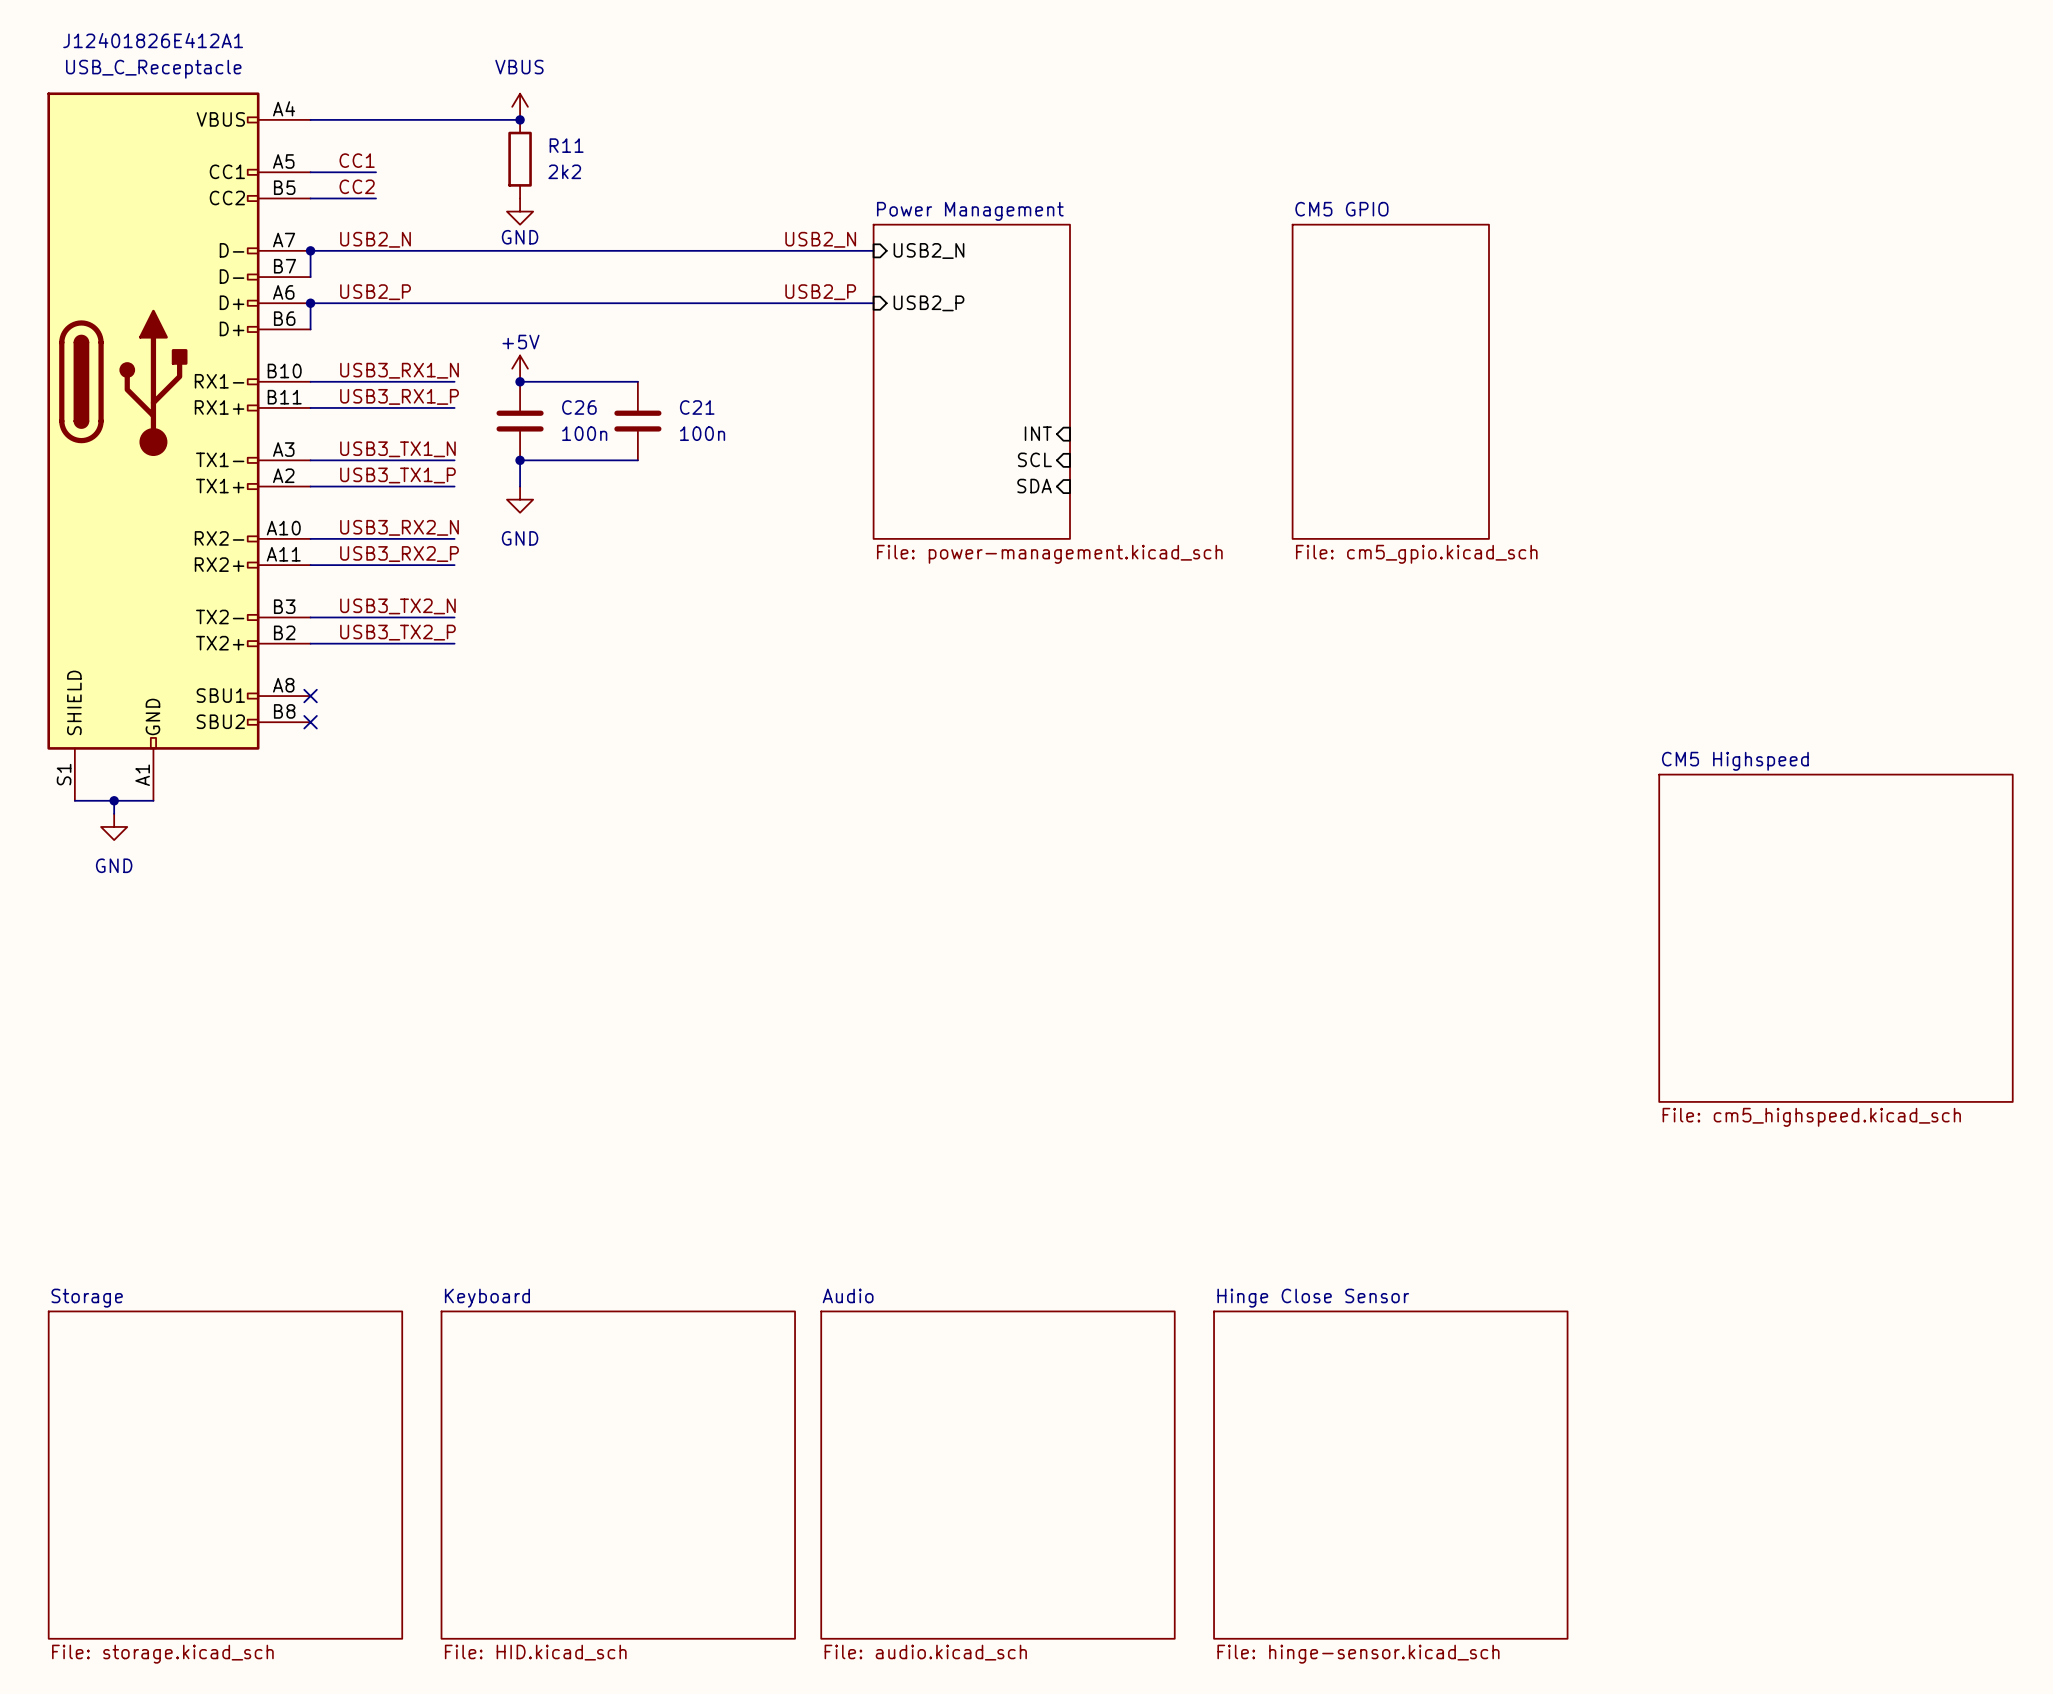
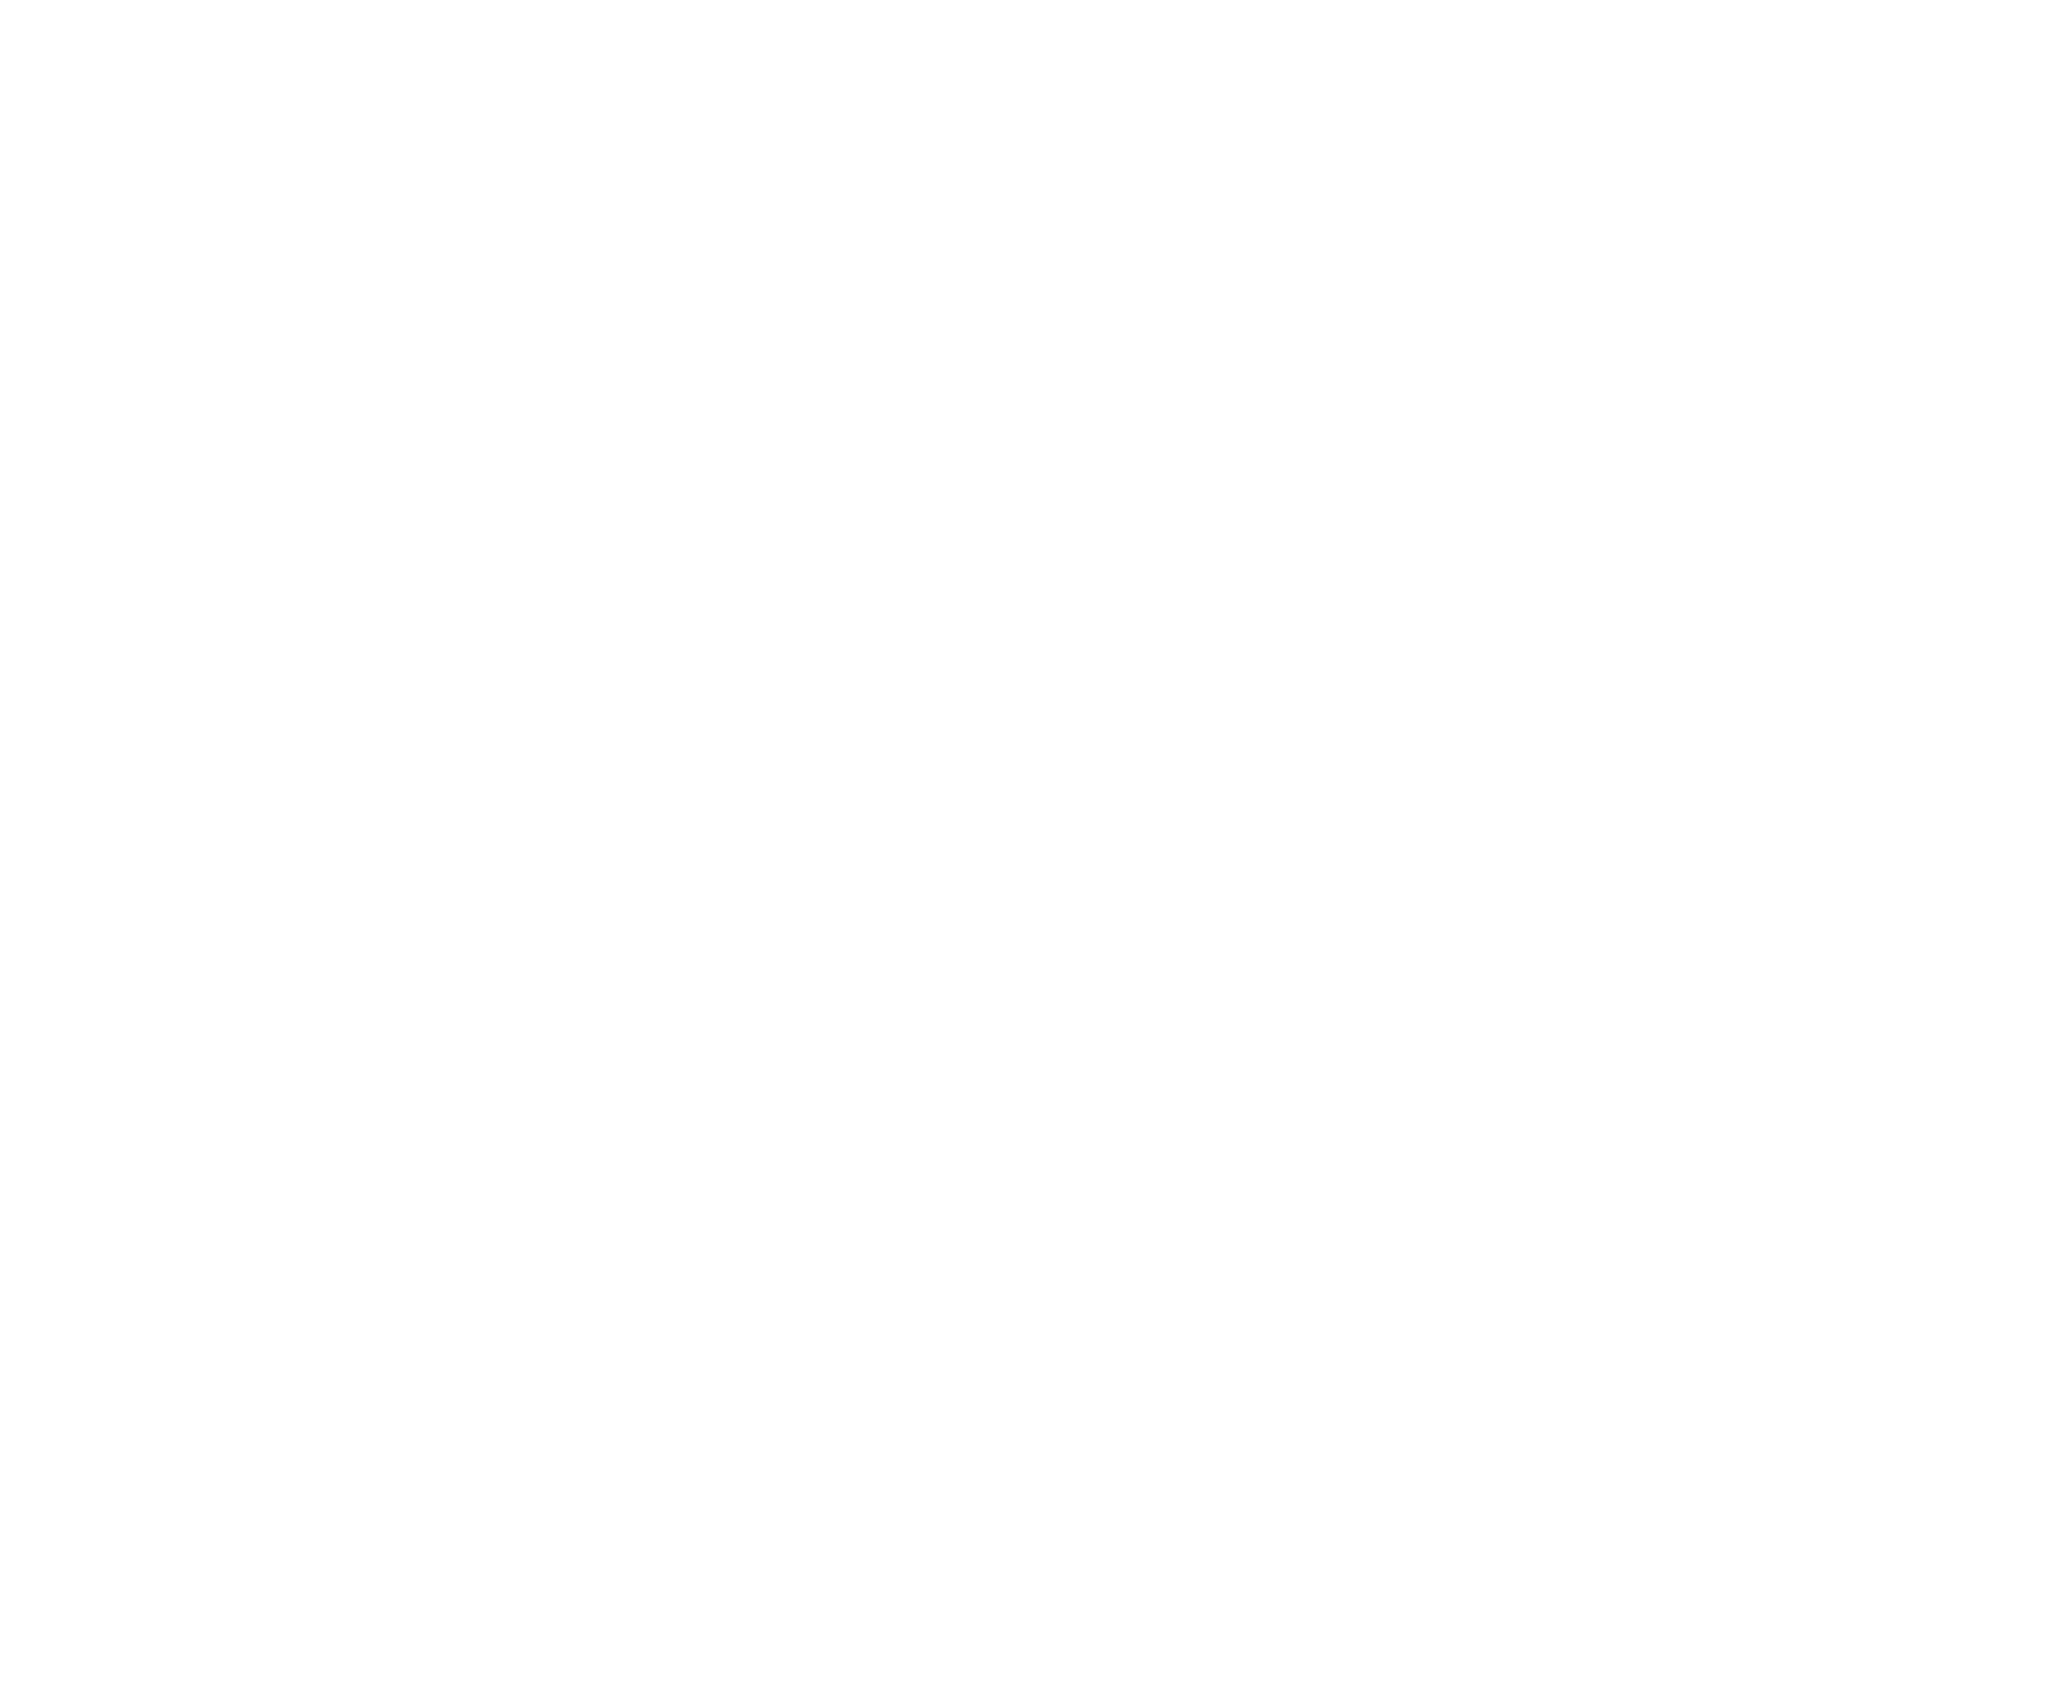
power symbol: VBUS (520, 106) -> none
wire: (310, 119) (520, 119) -> none
junction: (520, 119) -> none
R11: 2k2 (520, 159) -> none
label: CC1 (357, 160) -> none
wire: (310, 172) (376, 172) -> none
label: CC2 (357, 186) -> none
wire: (310, 198) (376, 198) -> none
power symbol: GND (520, 211) -> none
label: USB2_N (375, 239) -> none
label: USB2_N (820, 239) -> none
junction: (310, 250) -> none
wire: (873, 250) (310, 250) (310, 277) -> none
sheet pin: USB2_N (928, 250) -> none
label: USB2_P (375, 292) -> none
label: USB2_P (820, 292) -> none
junction: (310, 303) -> none
wire: (873, 303) (310, 303) (310, 329) -> none
sheet pin: USB2_P (928, 303) -> none
power symbol: +5V (520, 368) -> none
label: USB3_RX1_N (399, 370) -> none
wire: (310, 381) (454, 381) -> none
wire: (520, 381) (637, 381) -> none
junction: (520, 381) -> none
sheet Power Management: File: power-management.kicad_sch (971, 381) -> none
sheet CM5 GPIO: File: cm5_gpio.kicad_sch (1390, 381) -> none
label: USB3_RX1_P (399, 396) -> none
wire: (310, 407) (454, 407) -> none
C26: 100n (520, 421) -> none
C21: 100n (637, 421) -> none
sheet pin: INT (1038, 433) -> none
J12401826E412A1: USB_C_Receptacle (178, 446) -> none
label: USB3_TX1_N (397, 449) -> none
sheet pin: SCL (1034, 459) -> none
wire: (310, 460) (454, 460) -> none
junction: (520, 460) -> none
wire: (637, 460) (520, 460) (520, 486) -> none
label: USB3_TX1_P (397, 475) -> none
wire: (310, 486) (454, 486) -> none
sheet pin: SDA (1034, 486) -> none
power symbol: GND (520, 499) -> none
label: USB3_RX2_N (399, 527) -> none
wire: (310, 538) (454, 538) -> none
label: USB3_RX2_P (399, 554) -> none
wire: (310, 565) (454, 565) -> none
label: USB3_TX2_N (397, 606) -> none
wire: (310, 617) (454, 617) -> none
label: USB3_TX2_P (397, 632) -> none
wire: (310, 643) (454, 643) -> none
no-connect mark: (310, 696) -> none
no-connect mark: (310, 722) -> none
wire: (74, 800) (153, 800) -> none
wire: (114, 800) (114, 813) -> none
junction: (114, 800) -> none
power symbol: GND (114, 826) -> none
sheet CM5 Highspeed: File: cm5_highspeed.kicad_sch (1835, 938) -> none
sheet Storage: File: storage.kicad_sch (225, 1475) -> none
sheet Keyboard: File: HID.kicad_sch (618, 1475) -> none
sheet Audio: File: audio.kicad_sch (997, 1475) -> none
sheet Hinge Close Sensor: File: hinge-sensor.kicad_sch (1390, 1475) -> none

